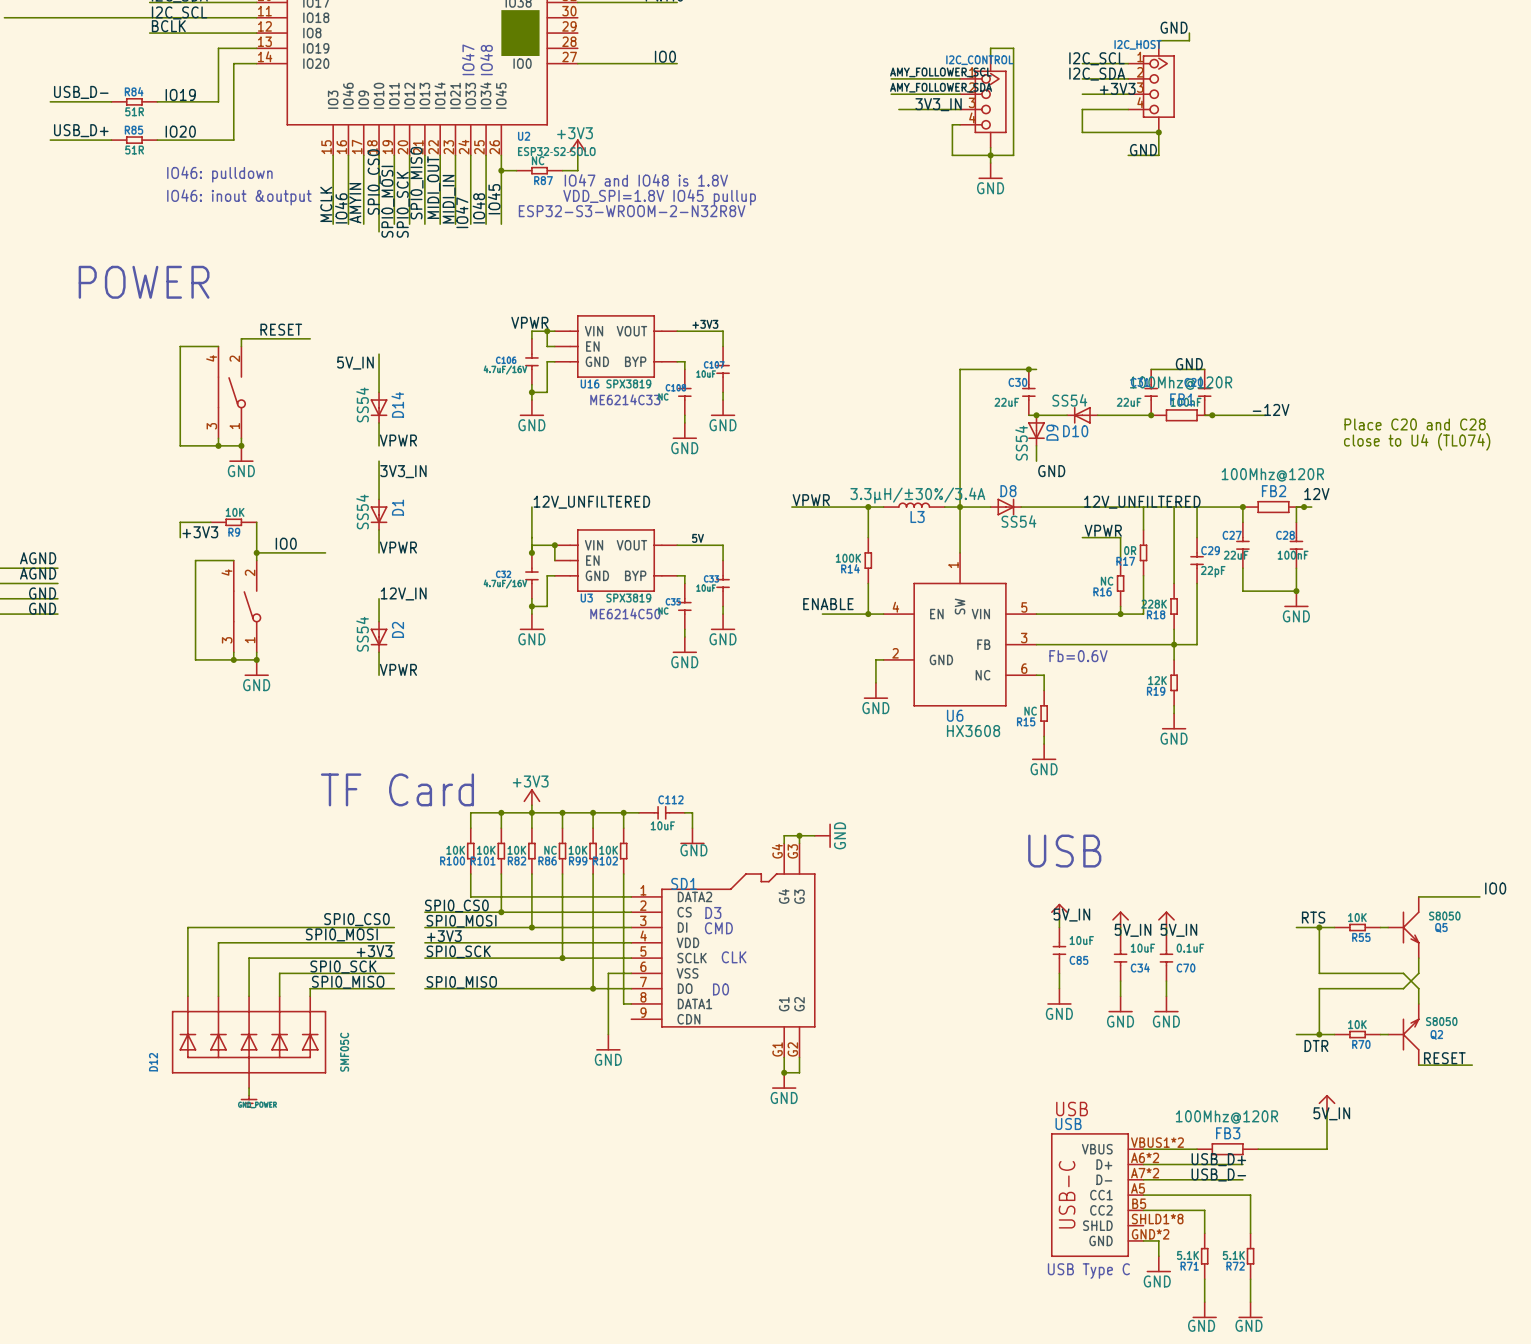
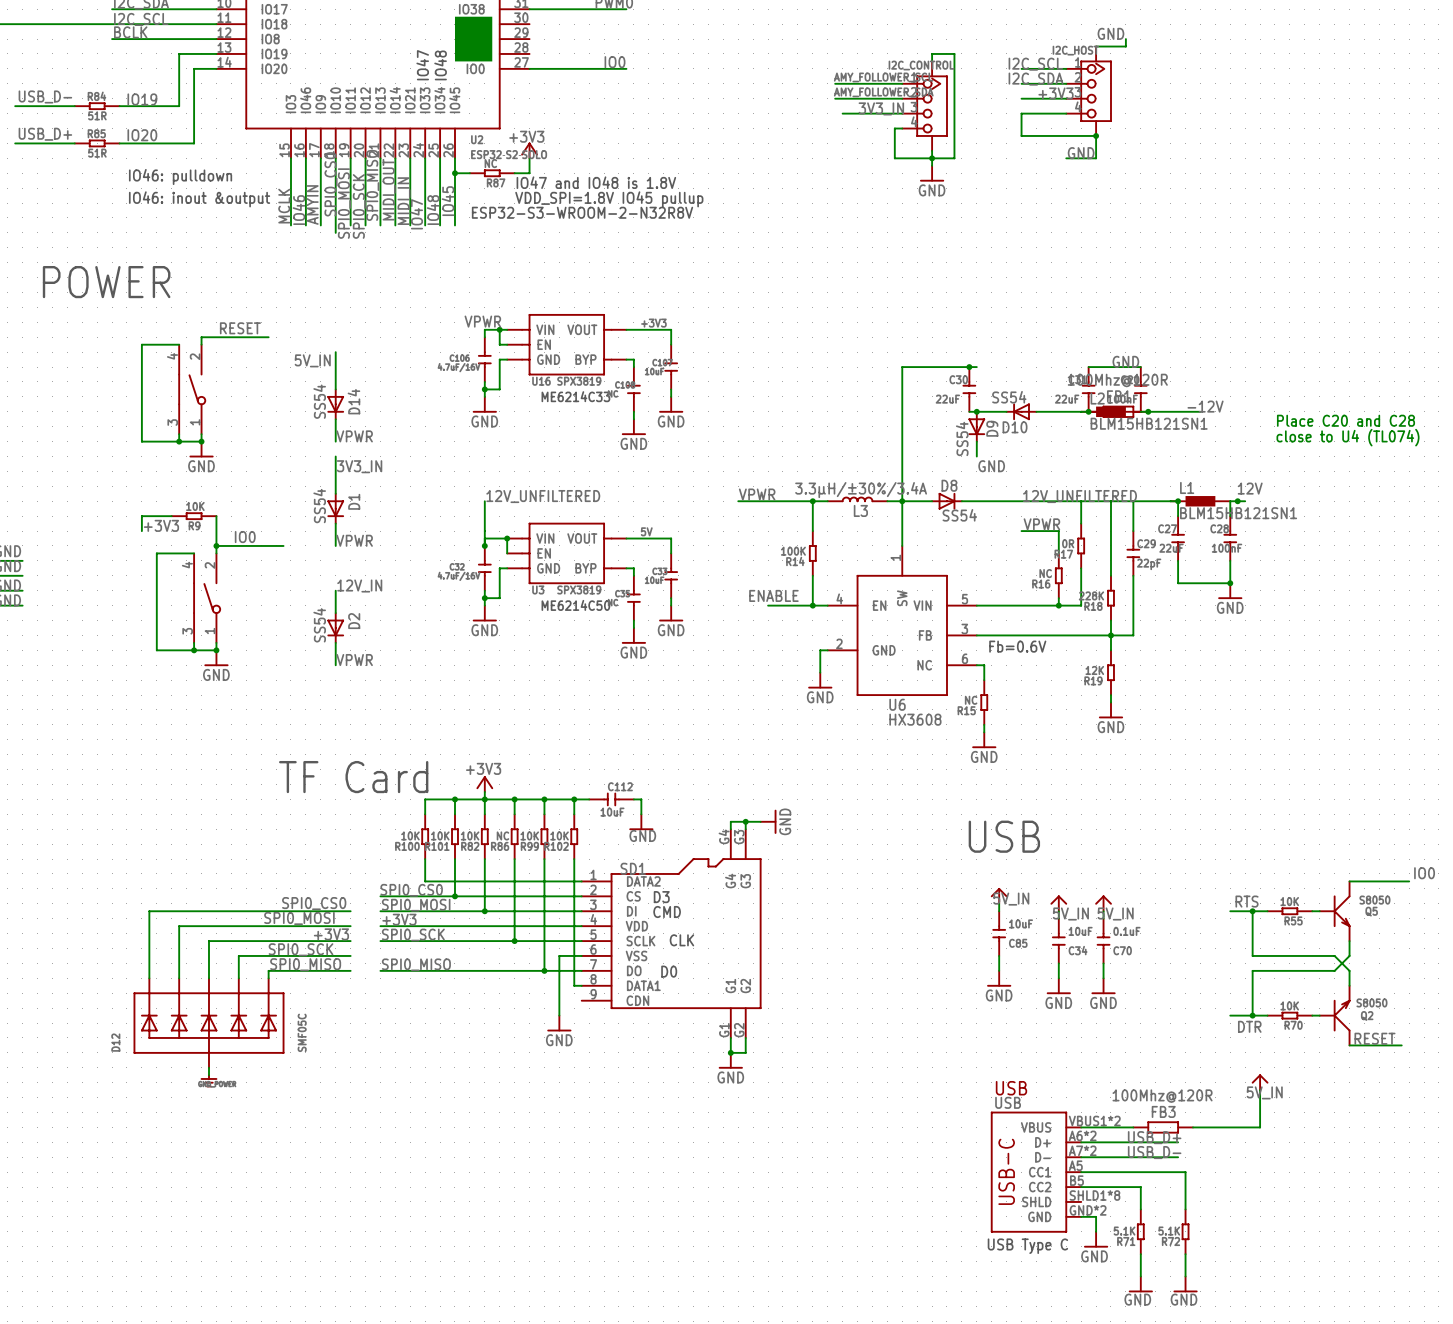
L2: none -> BLM15HB121SN1 (1110, 411)
L1: none -> BLM15HB121SN1 (1200, 501)
FB2: 100Mhz@120R (1273, 507) -> none

